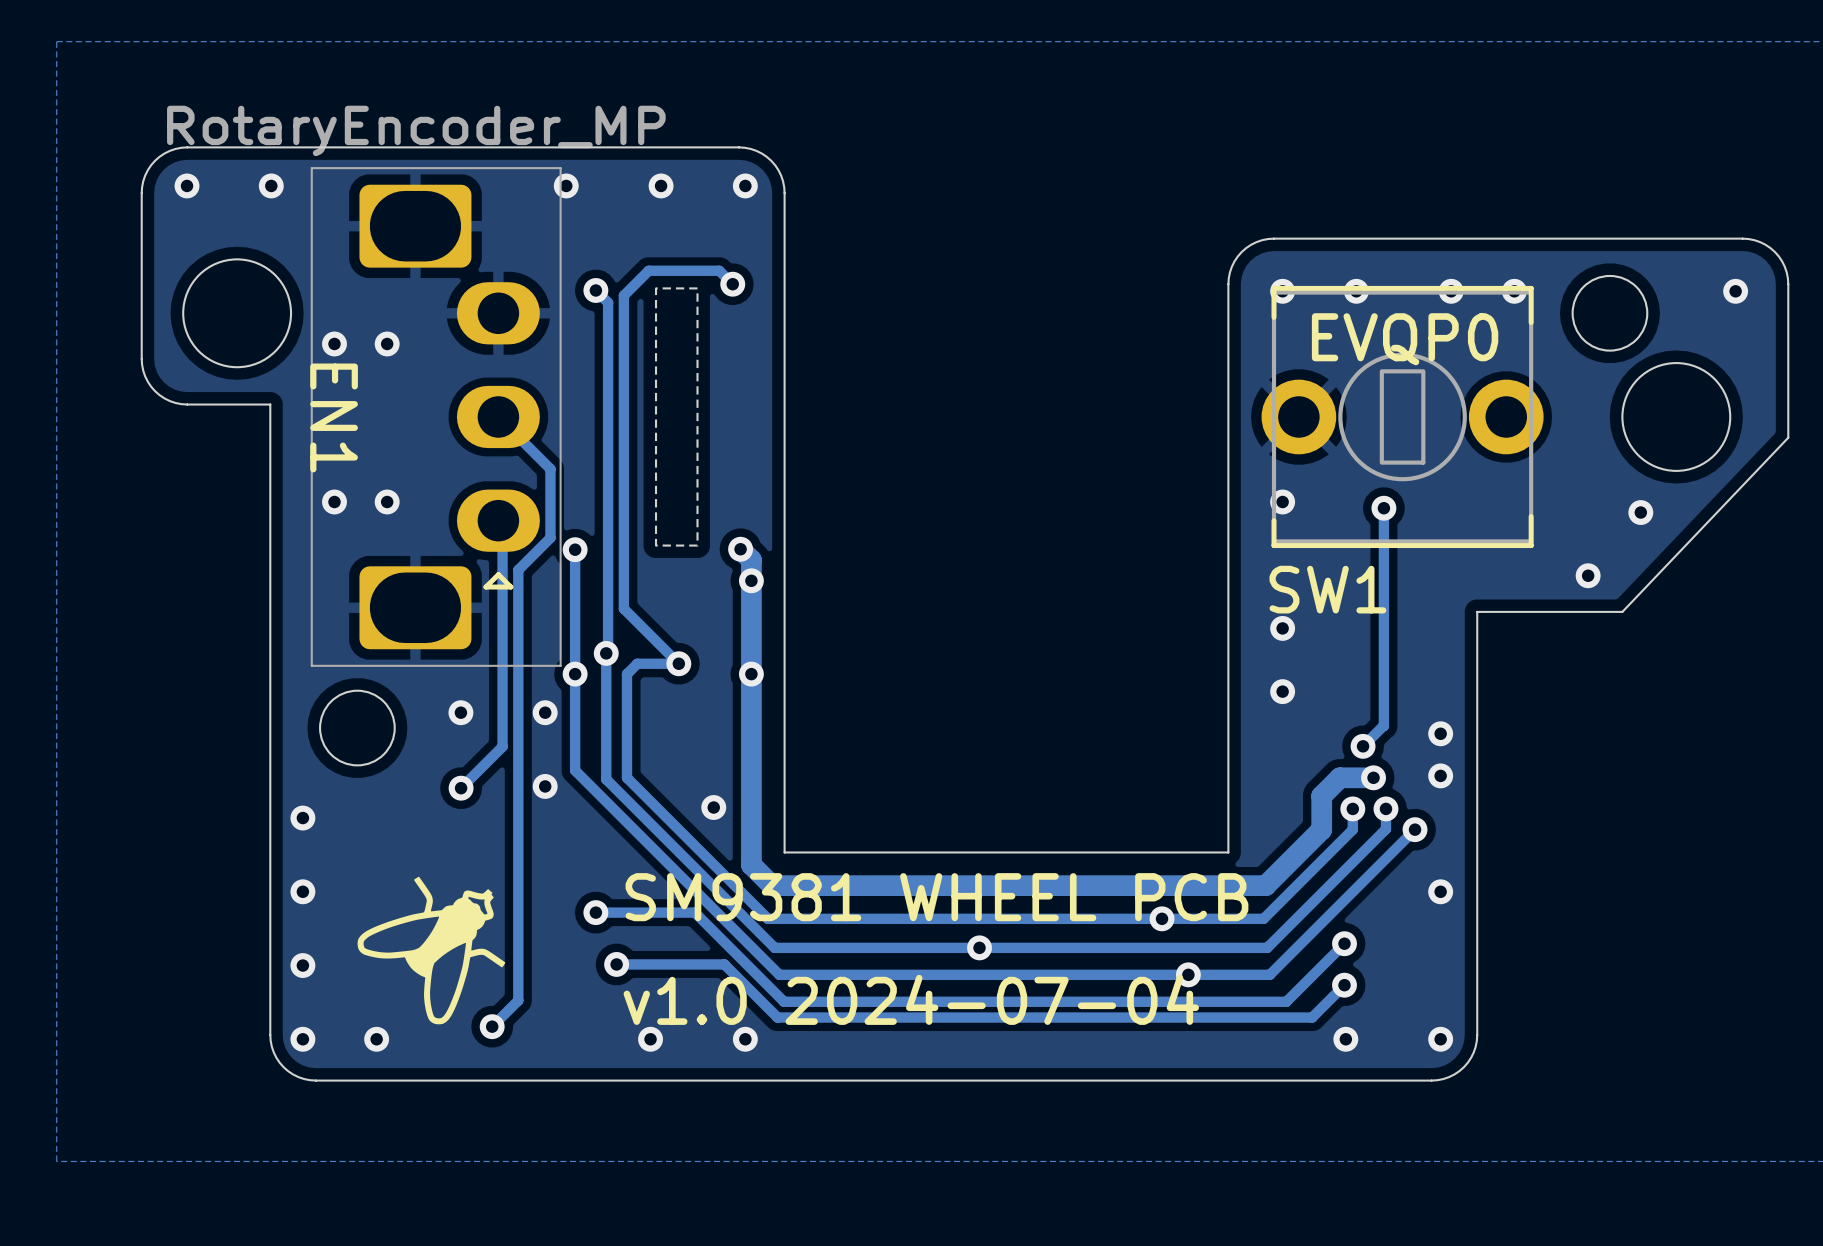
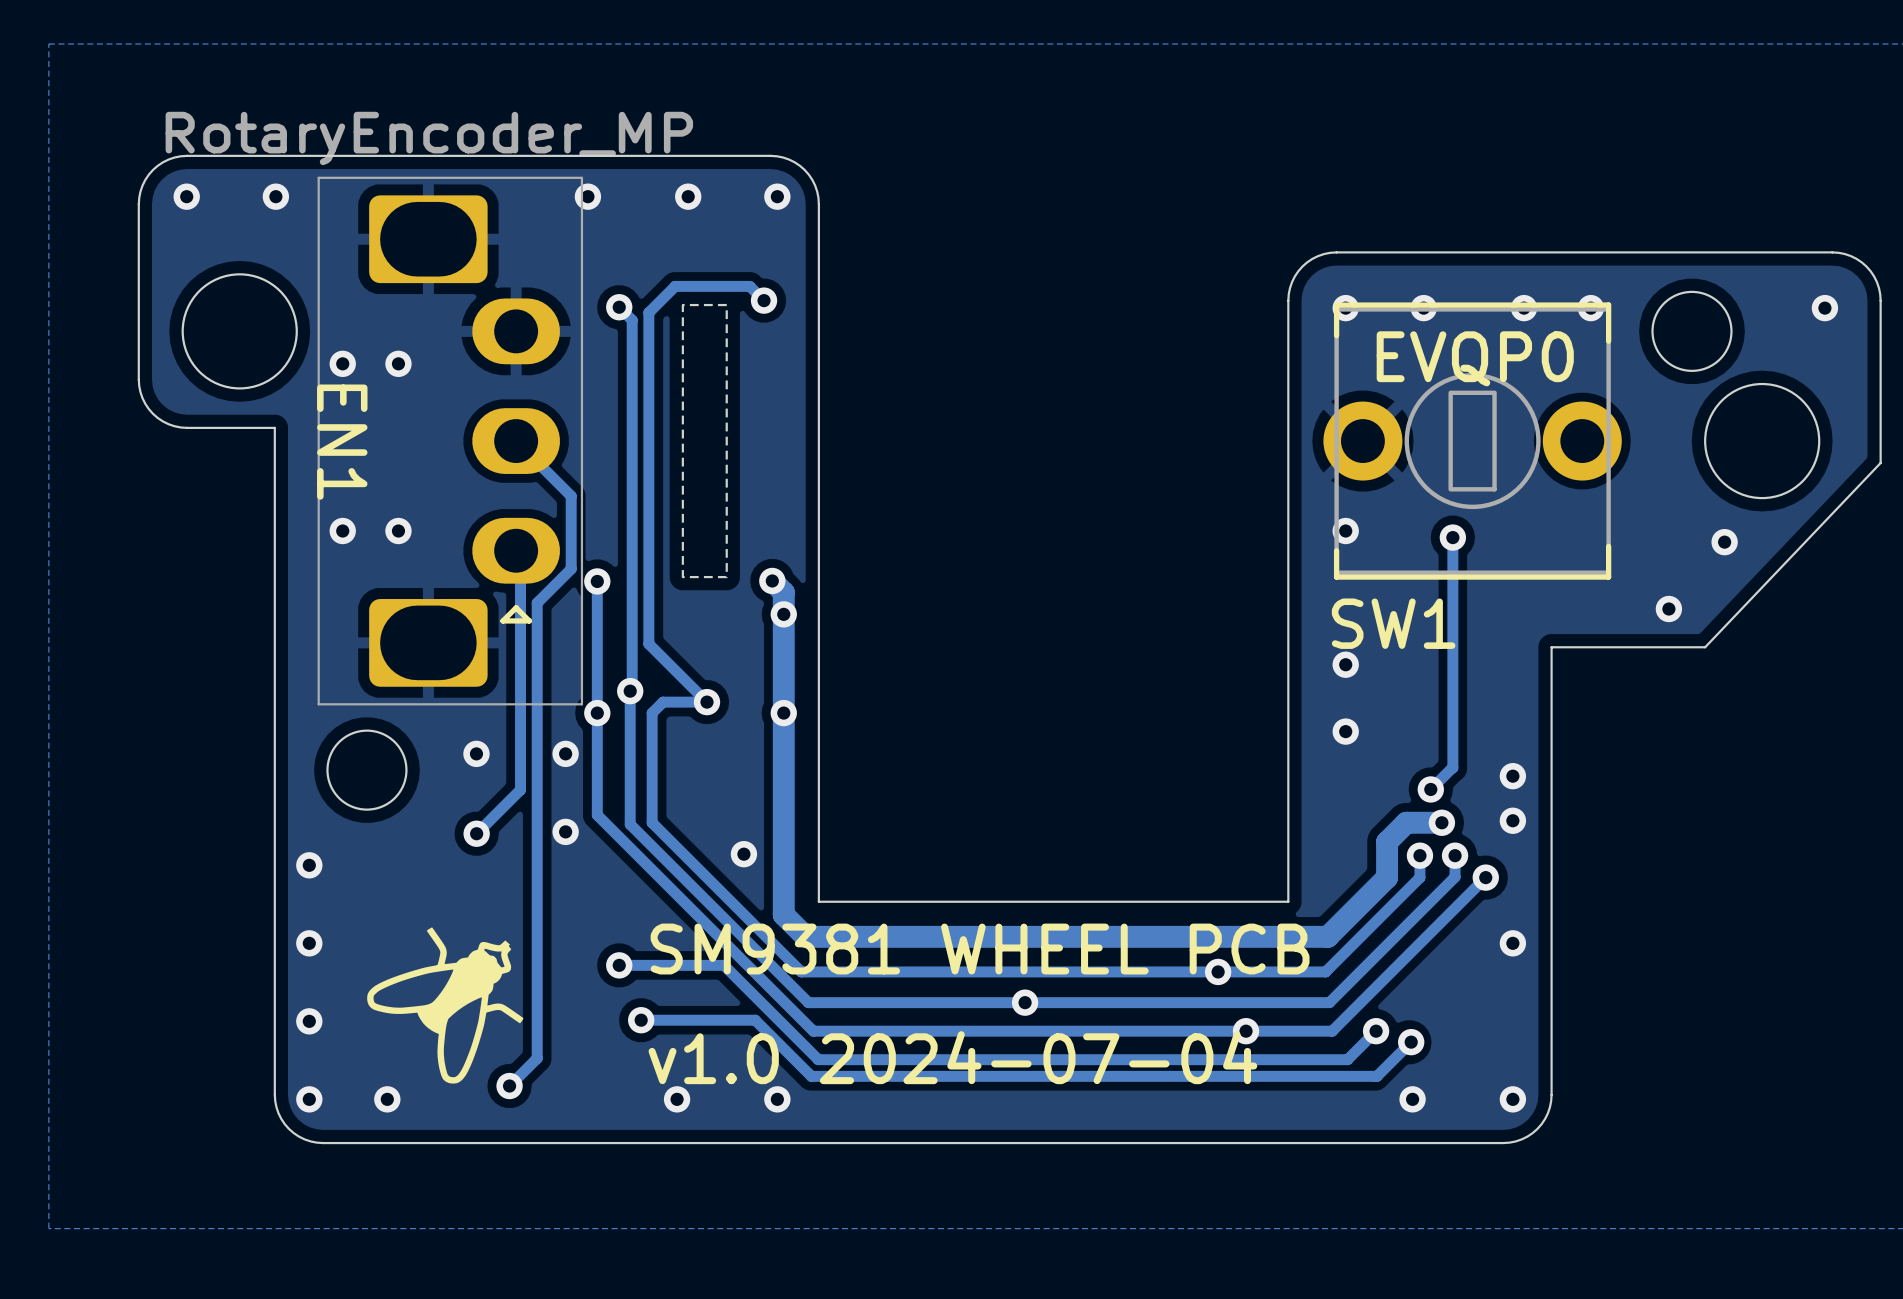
track: (1344, 943) (1284, 1001) -> (1376, 1031) (1347, 1059)
via position: (1344, 943) -> (1376, 1031)

